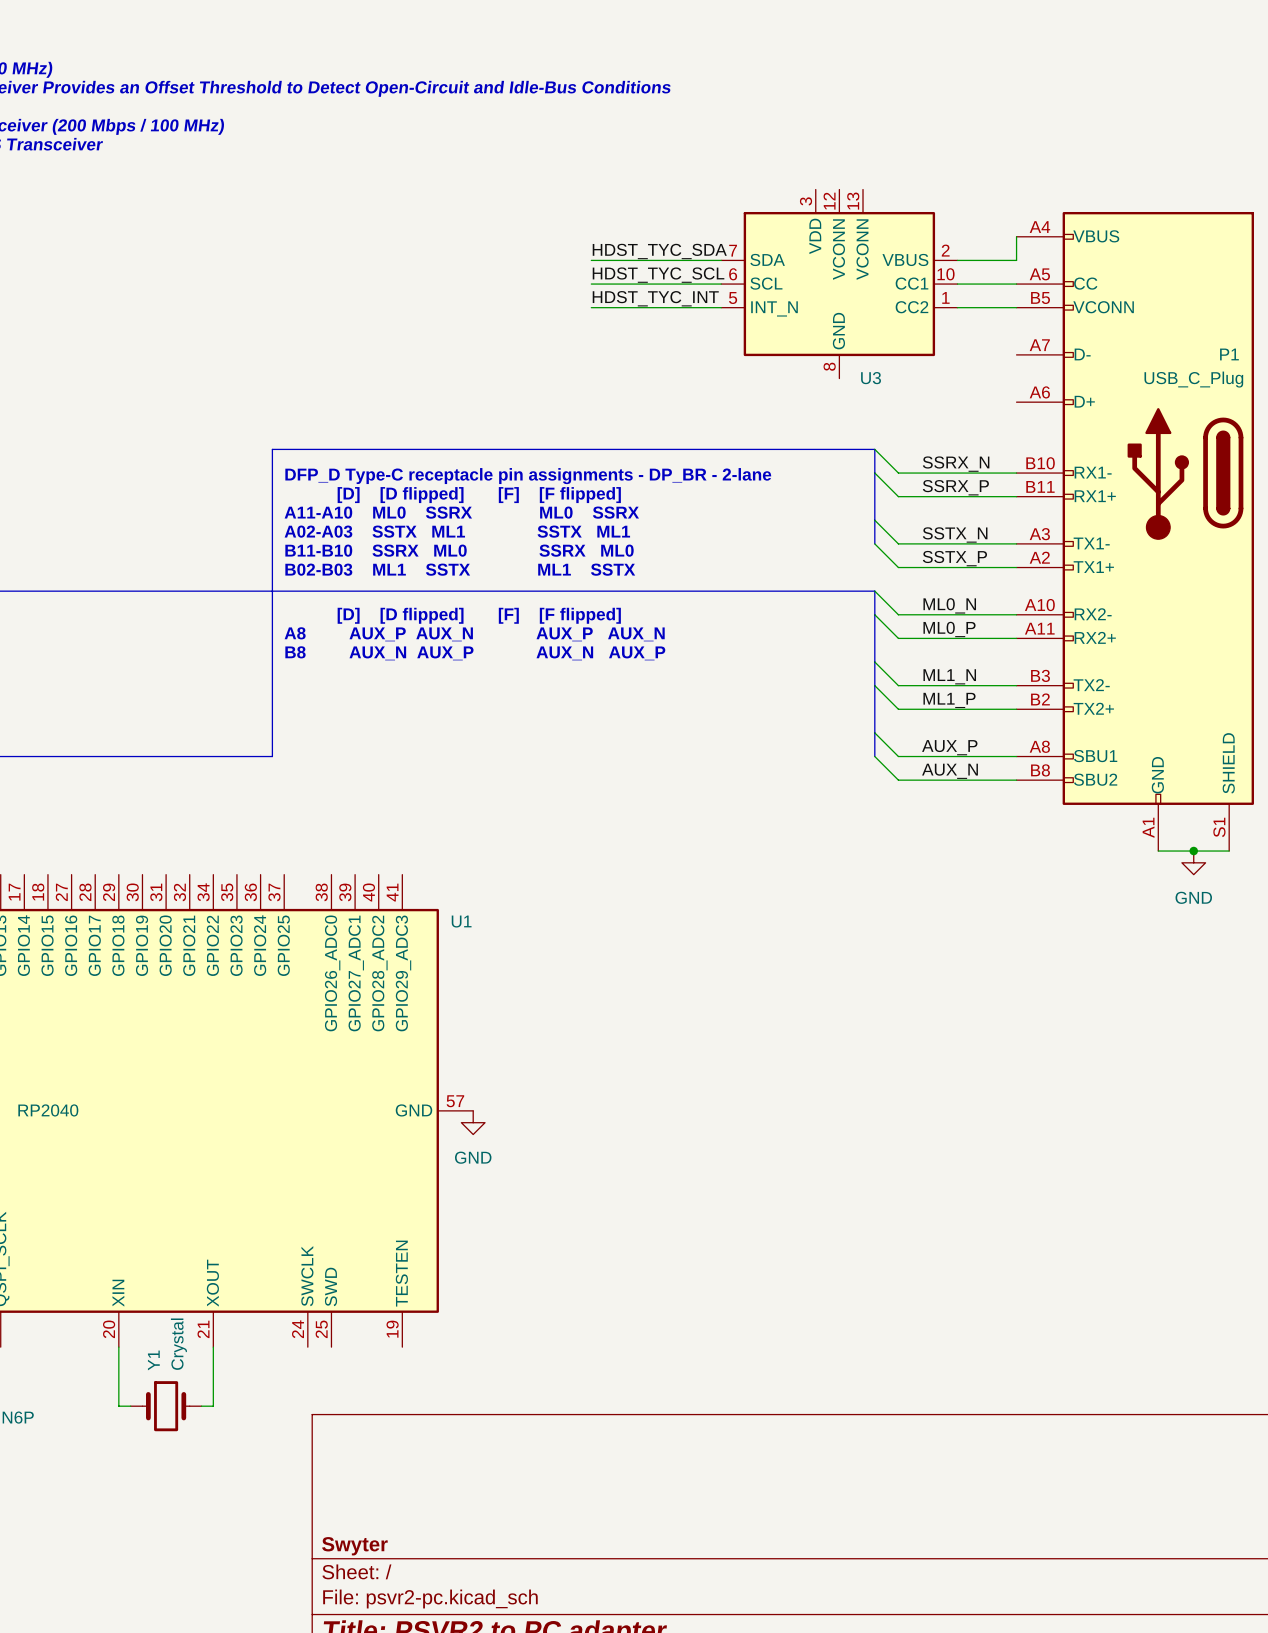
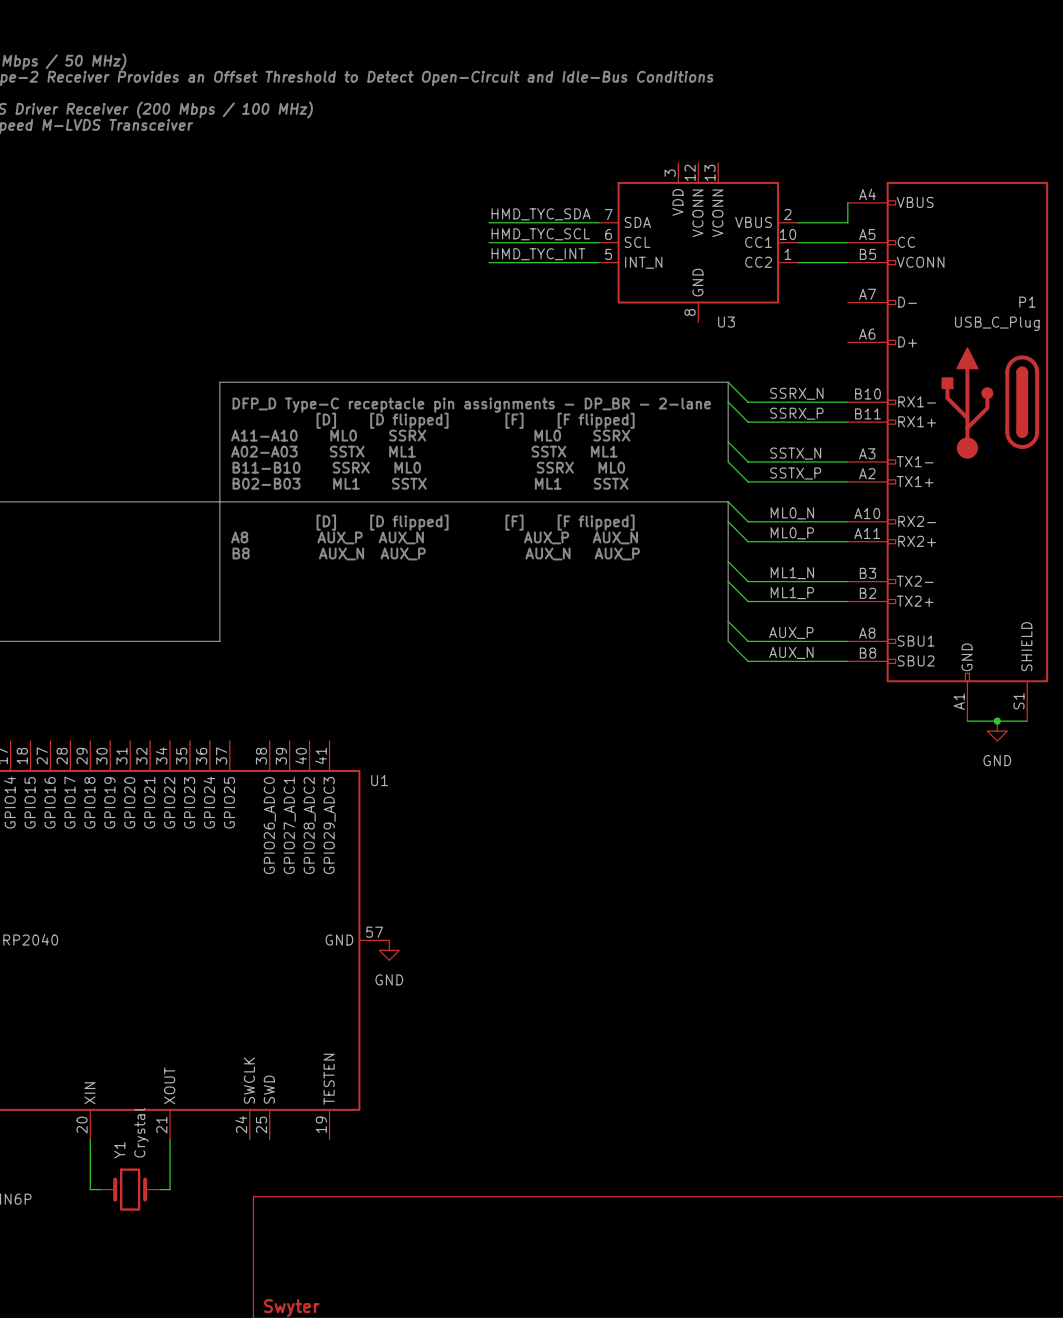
label: HDST_TYC_SDA (659, 251) -> HMD_TYC_SDA (541, 214)
label: HDST_TYC_SCL (658, 275) -> HMD_TYC_SCL (540, 234)
label: HDST_TYC_INT (655, 298) -> HMD_TYC_INT (538, 254)

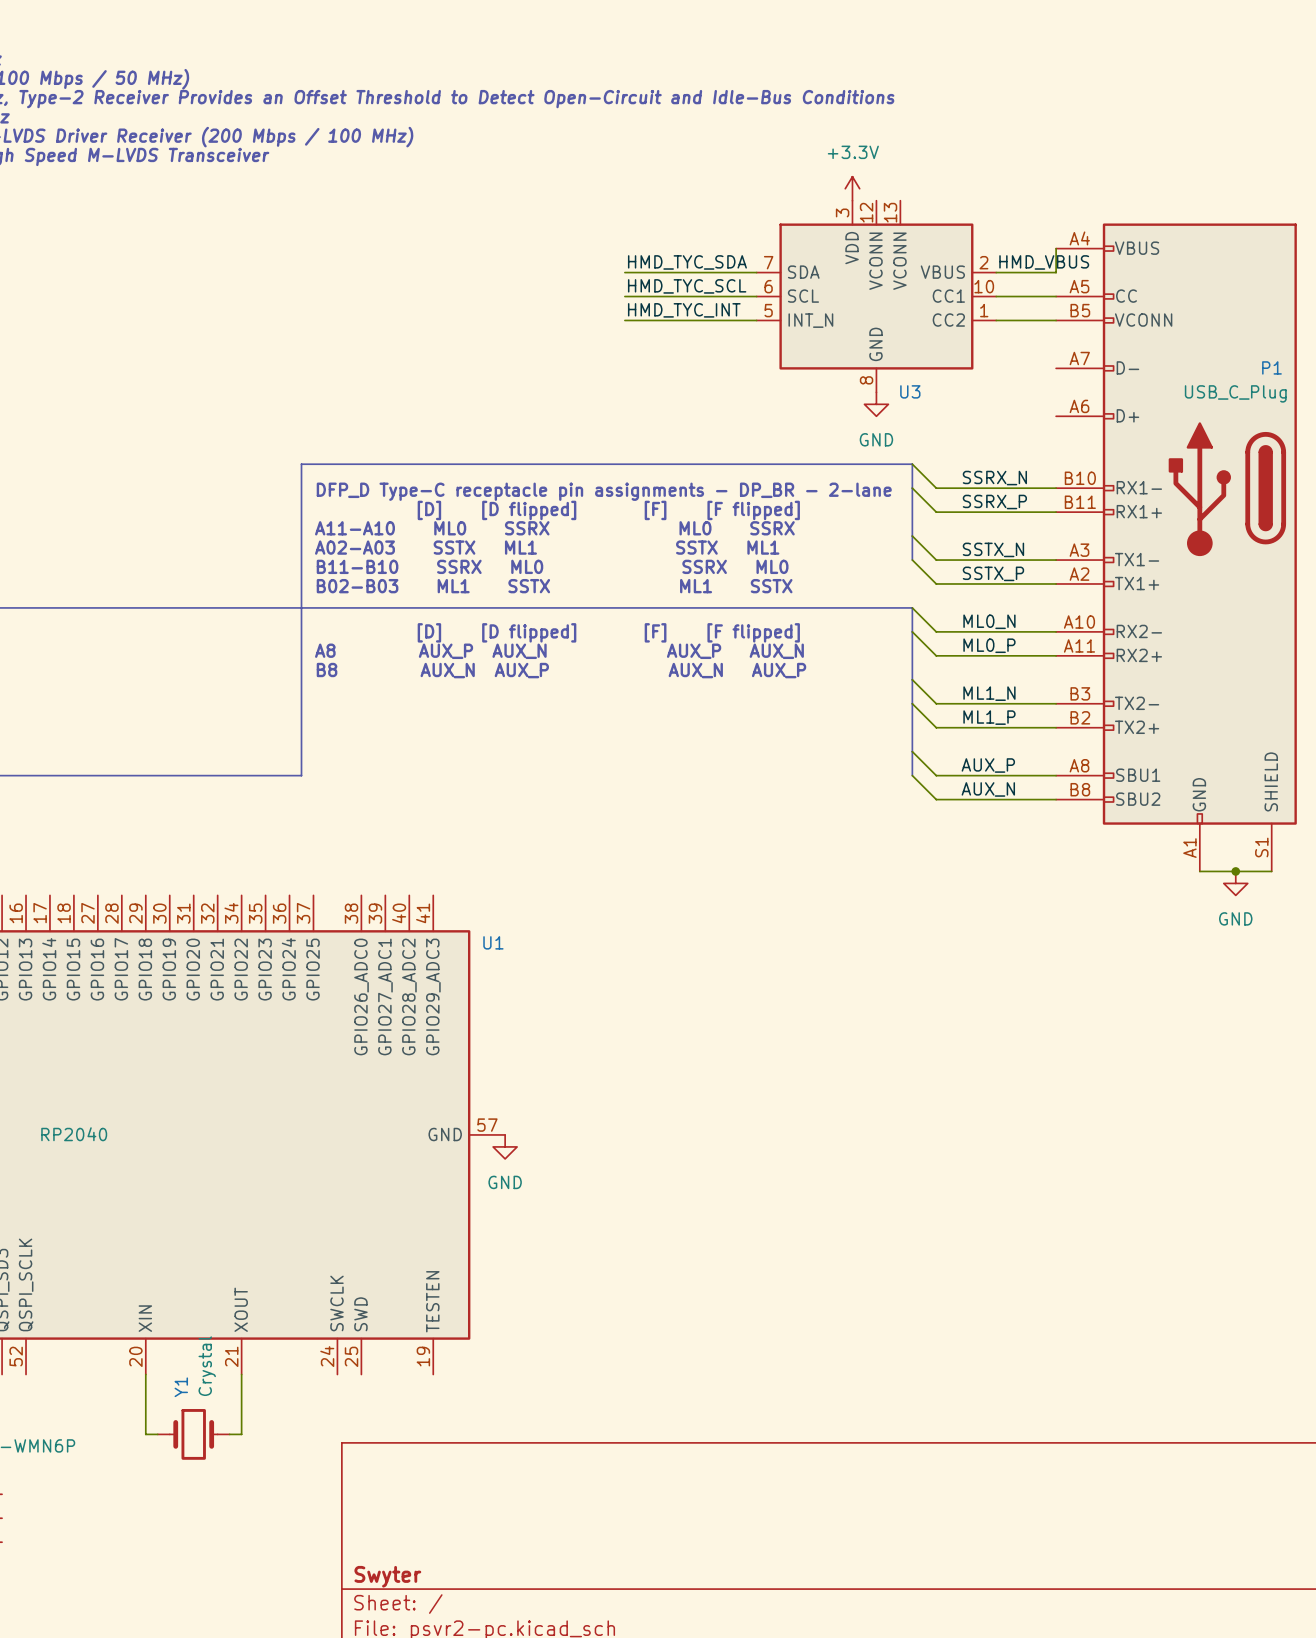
power symbol: none -> +3.3V (852, 188)
label: none -> HMD_VBUS (1044, 262)
power symbol: none -> GND (876, 404)

